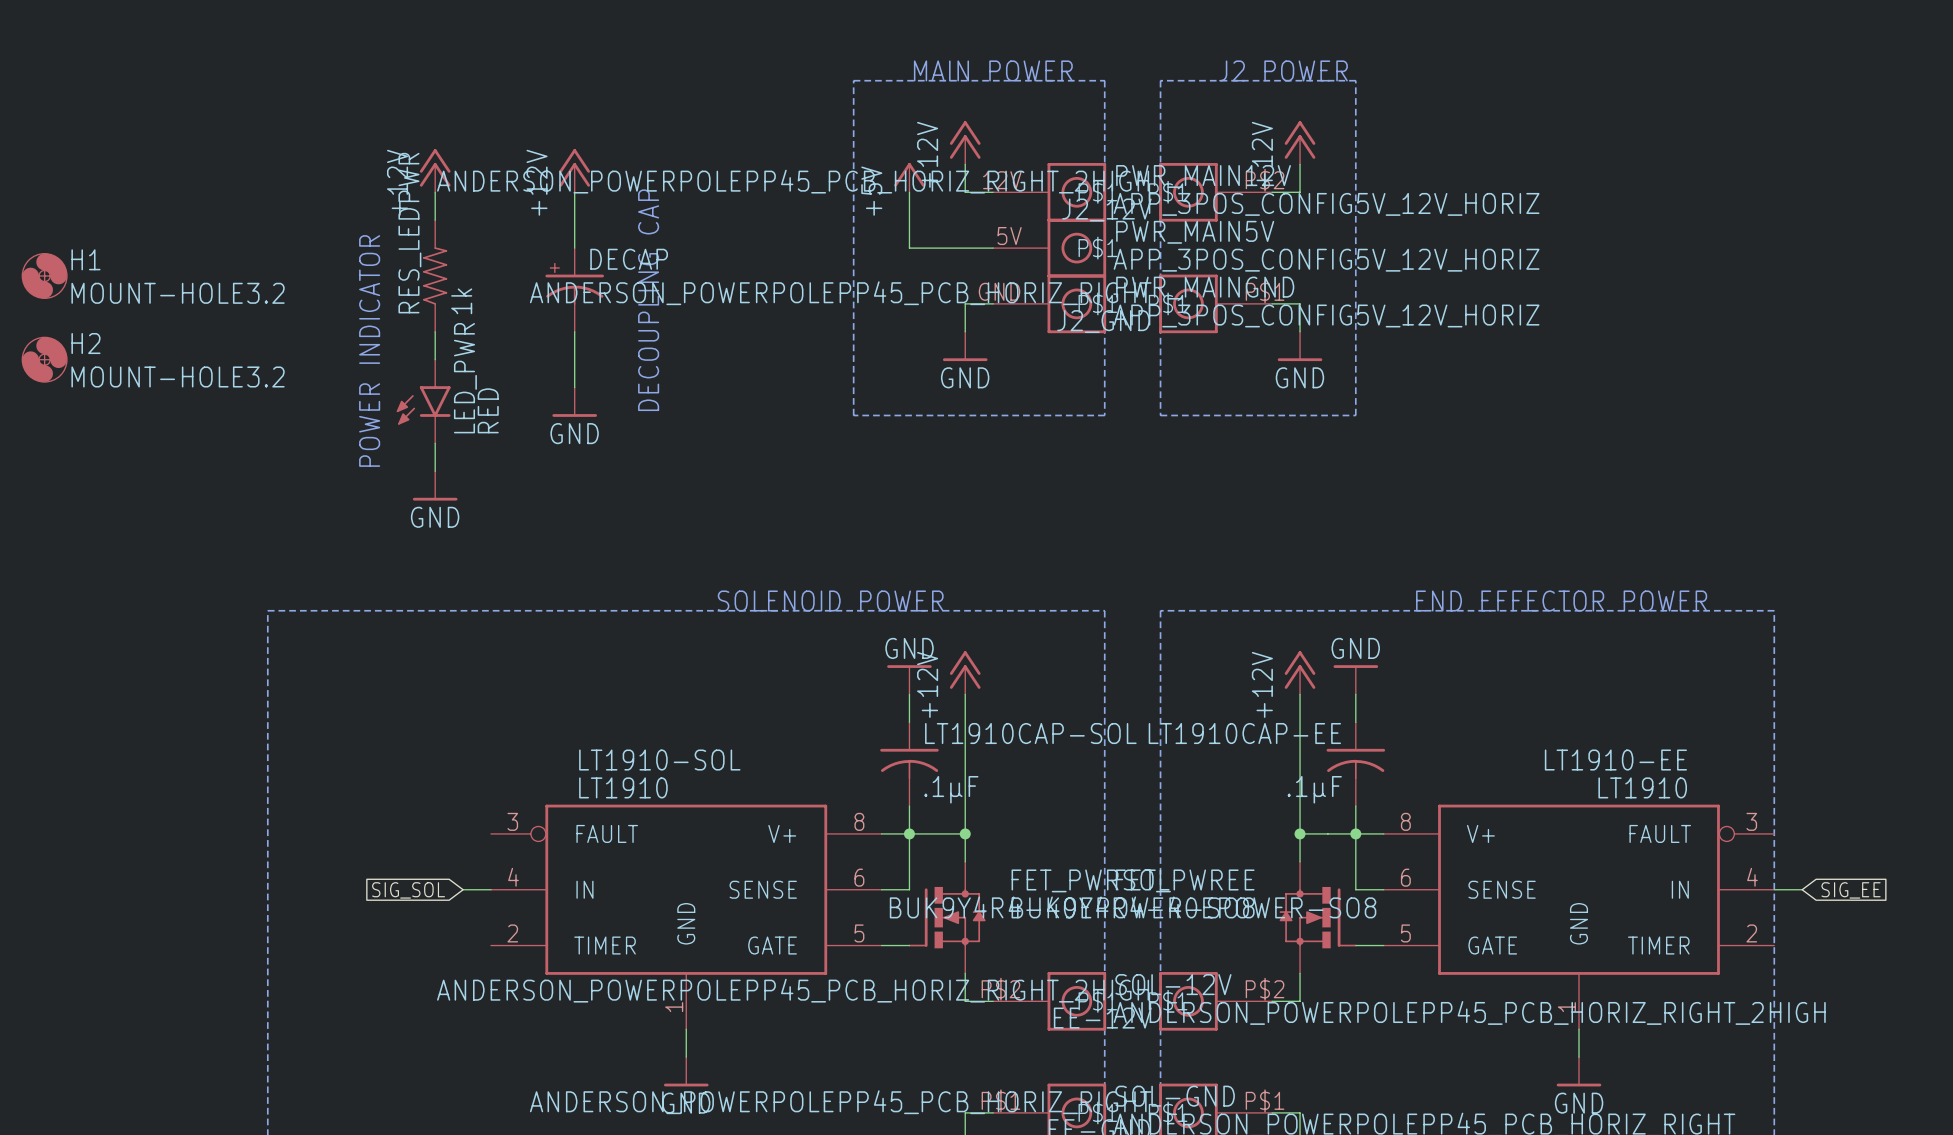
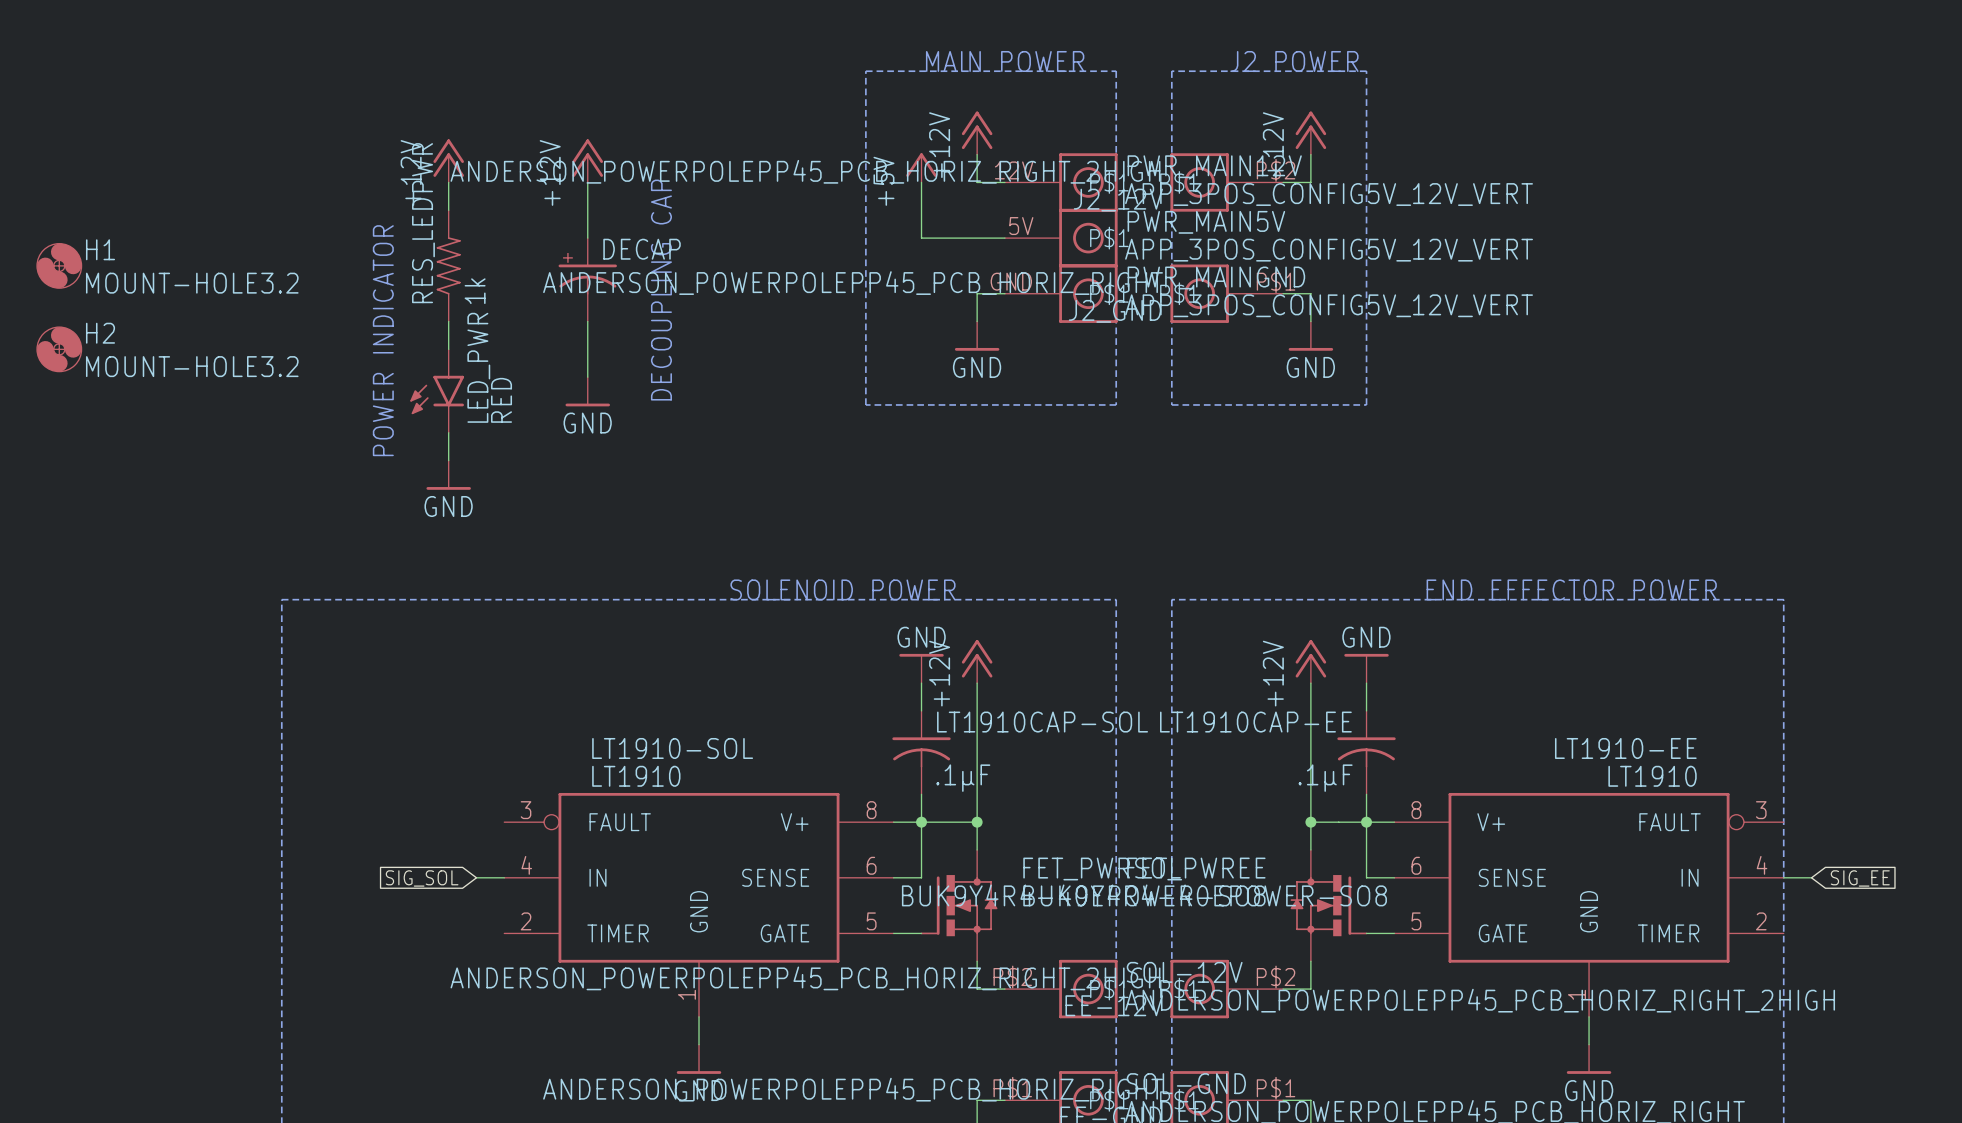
PWR_MAIN12V value: APP_3POS_CONFIG5V_12V_HORIZ (1326, 204) -> APP_3POS_CONFIG5V_12V_VERT (1329, 194)
PWR_MAIN5V value: APP_3POS_CONFIG5V_12V_HORIZ (1326, 260) -> APP_3POS_CONFIG5V_12V_VERT (1329, 250)
PWR_MAINGND value: APP_3POS_CONFIG5V_12V_HORIZ (1326, 315) -> APP_3POS_CONFIG5V_12V_VERT (1329, 305)

